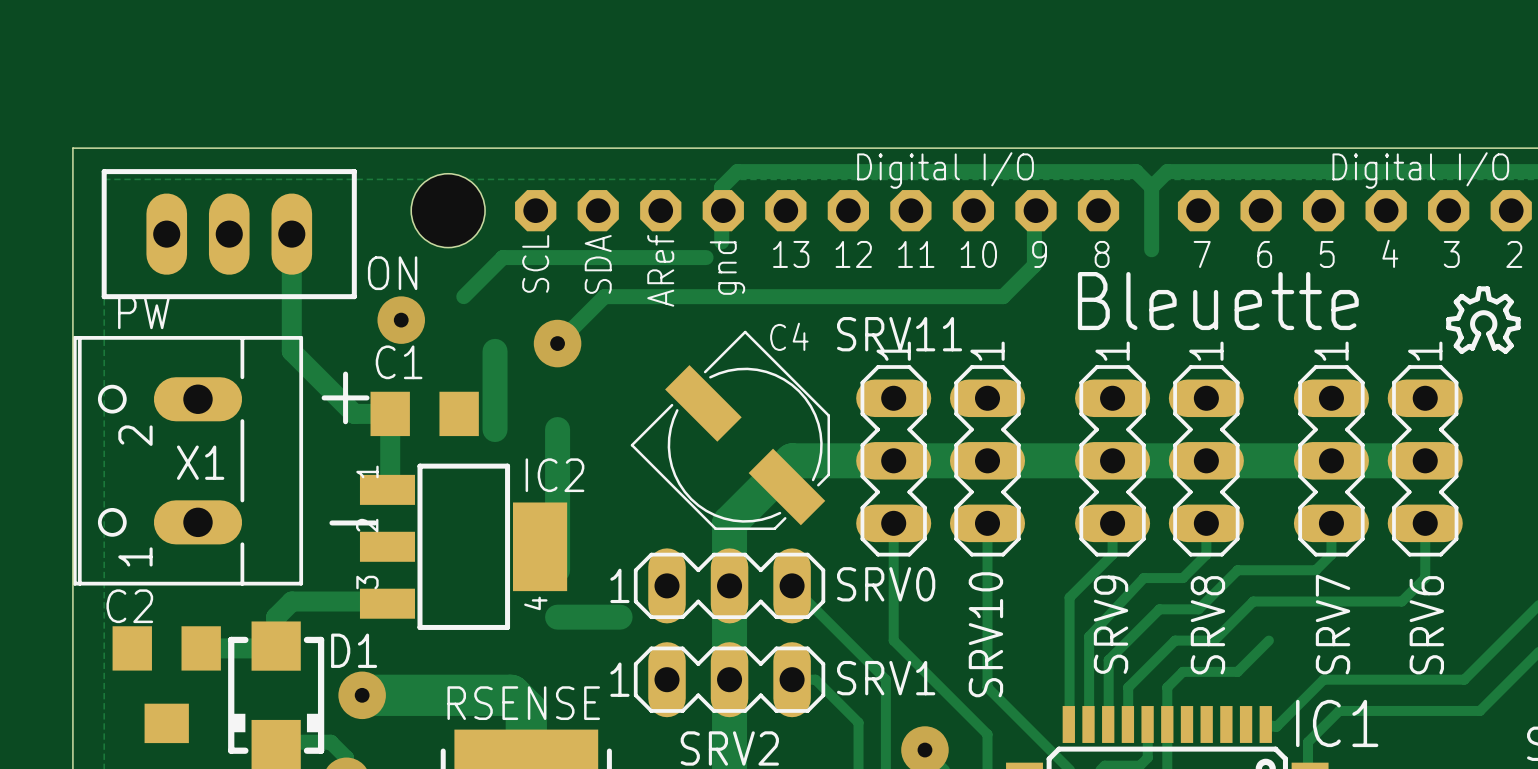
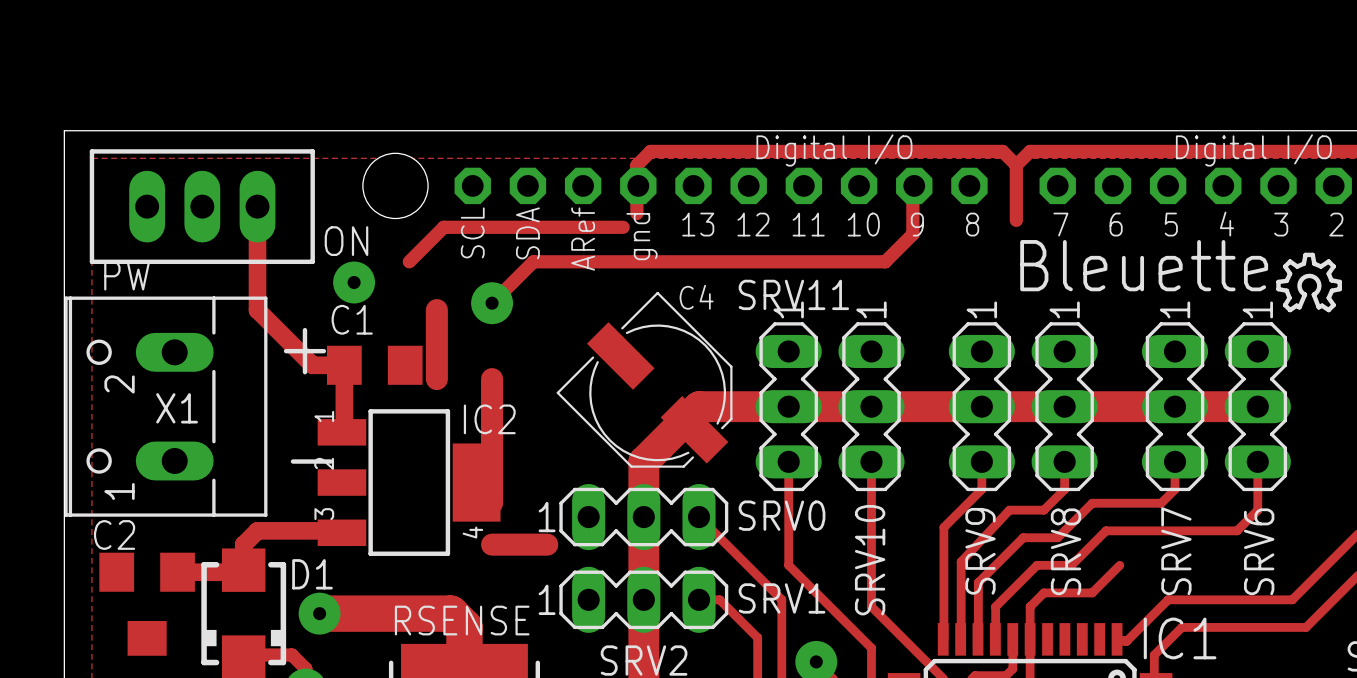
text position: Bleuette (1218, 301) -> Bleuette (1144, 265)

